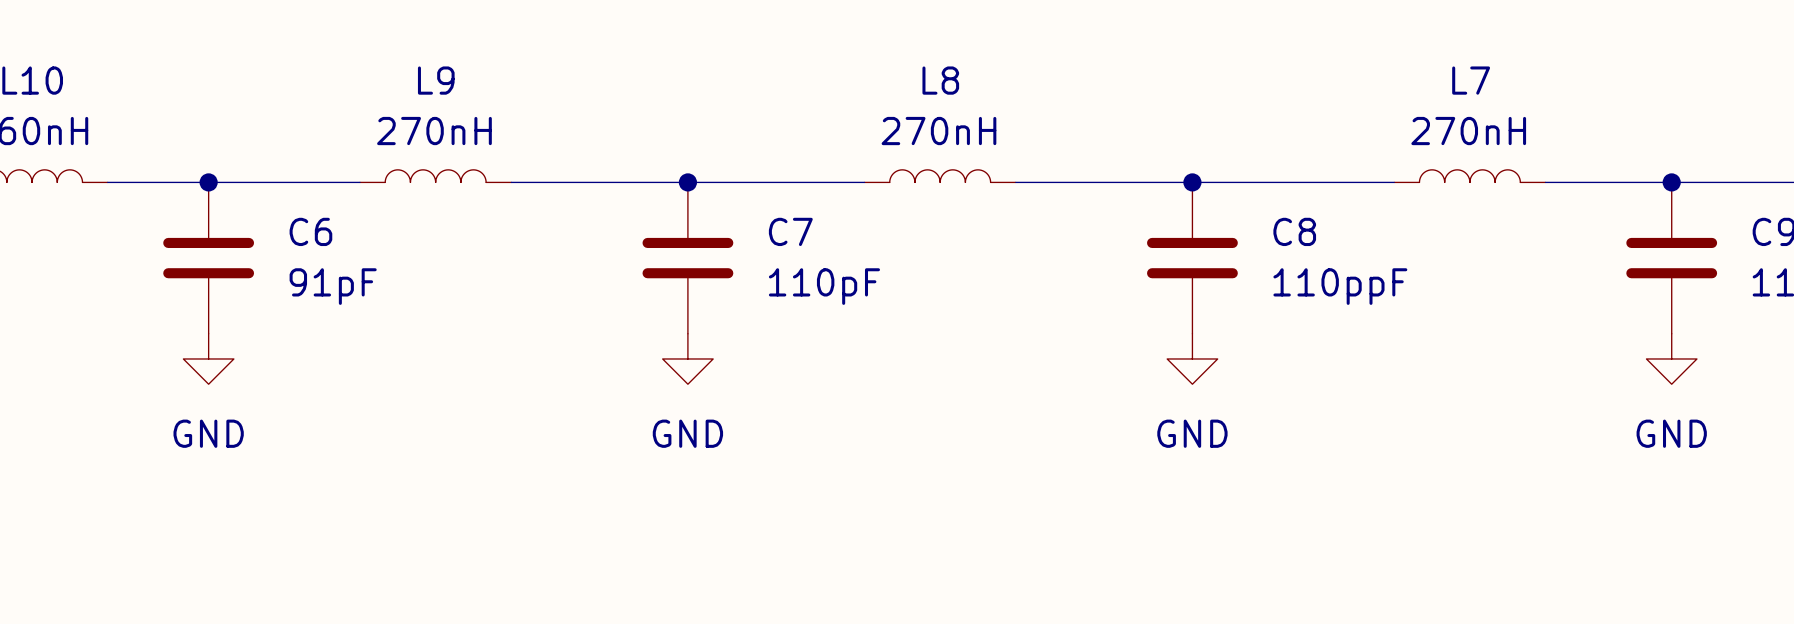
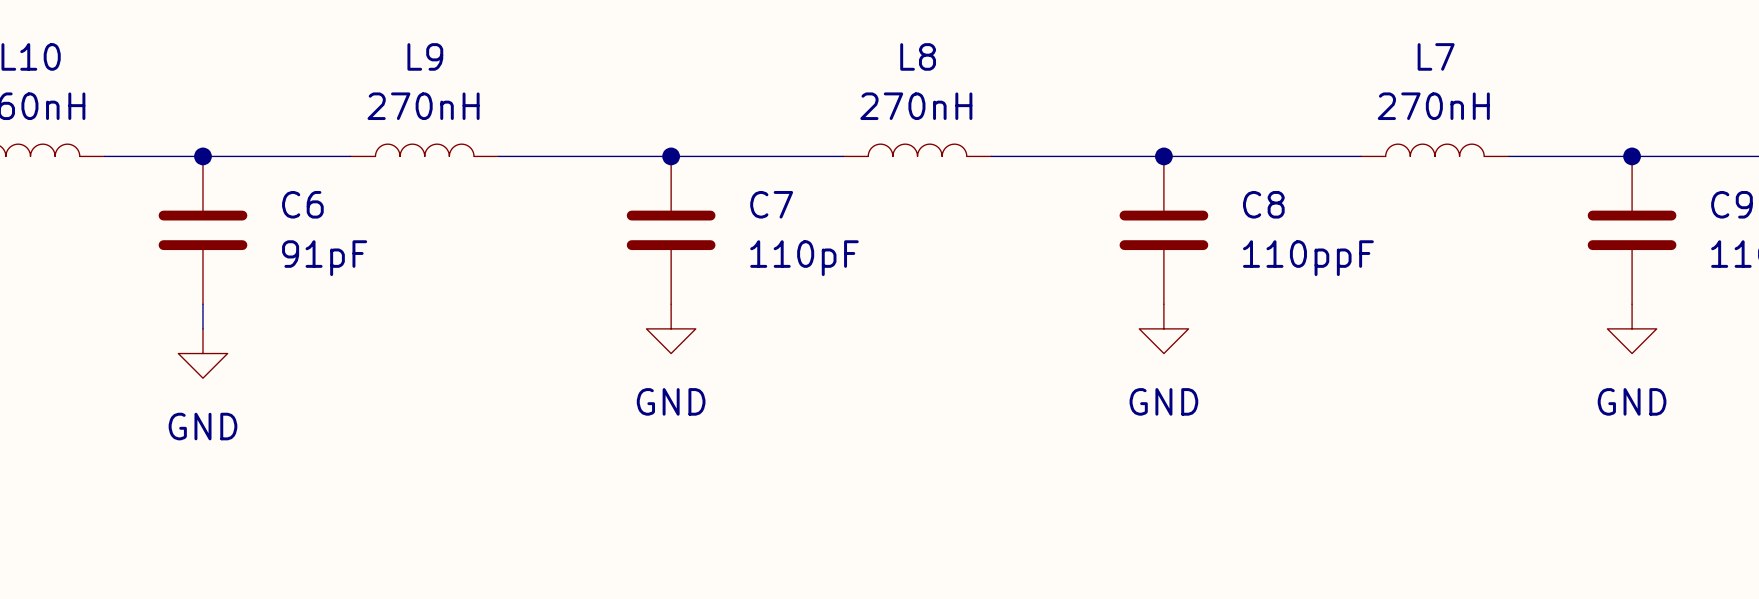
power symbol position: GND (208, 358) -> GND (202, 353)

